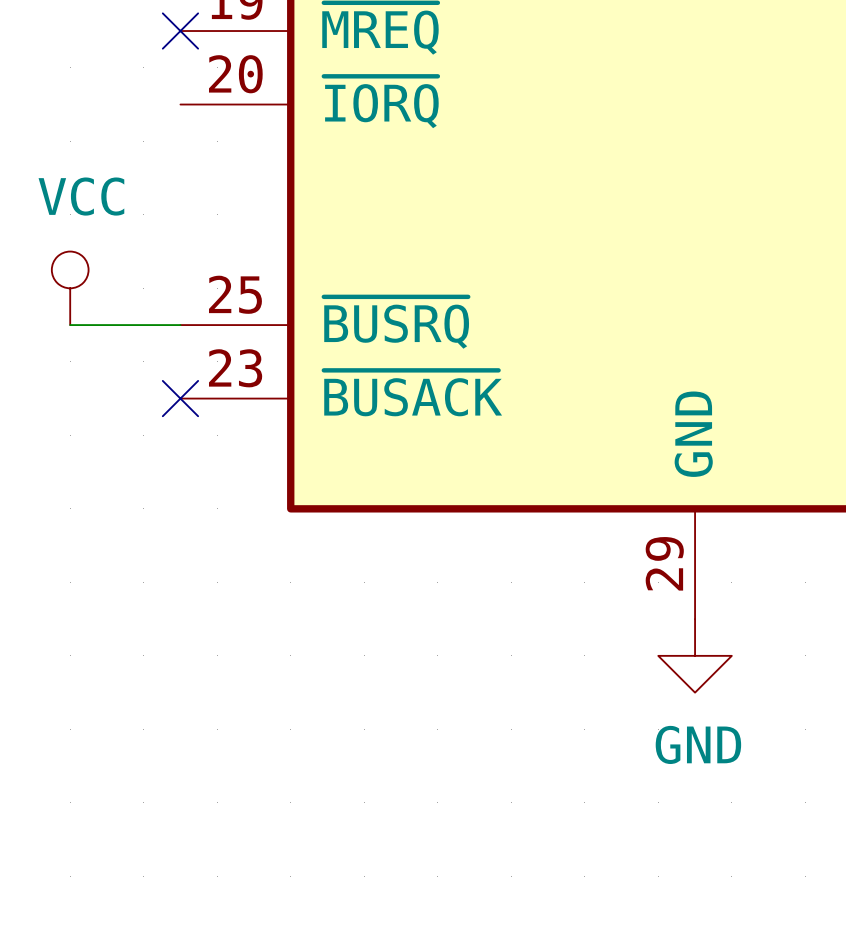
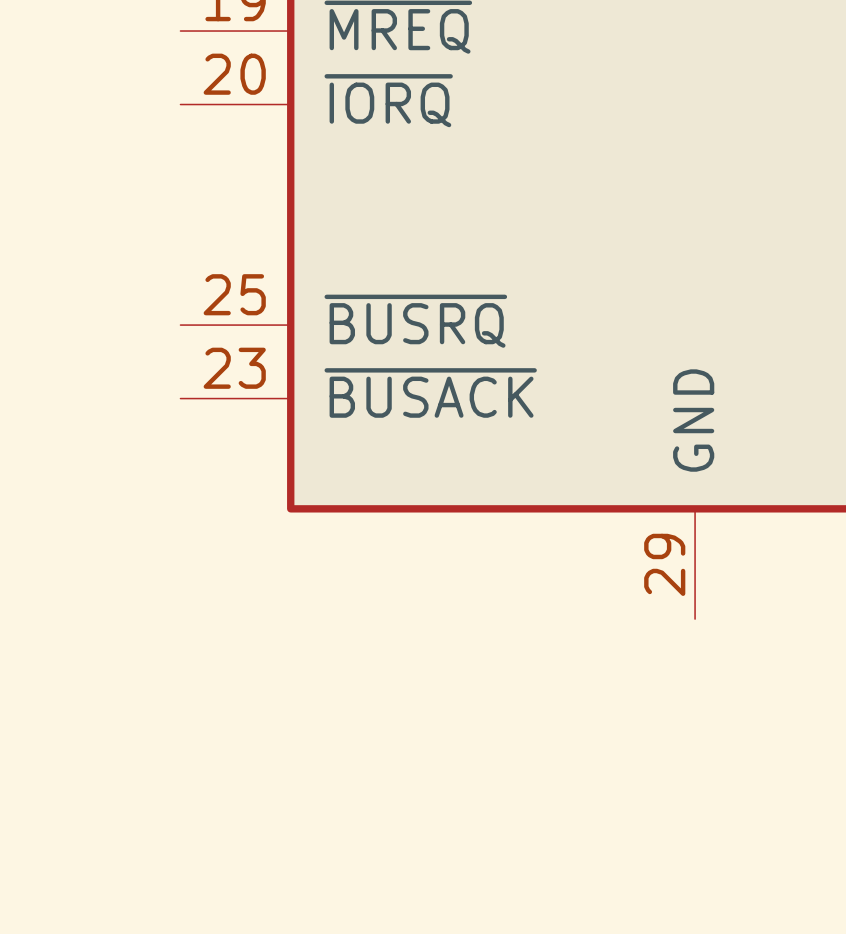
no-connect mark: (180, 31) -> none
power symbol: VCC (70, 288) -> none
wire: (70, 325) (180, 325) -> none
no-connect mark: (180, 398) -> none
power symbol: GND (695, 655) -> none

